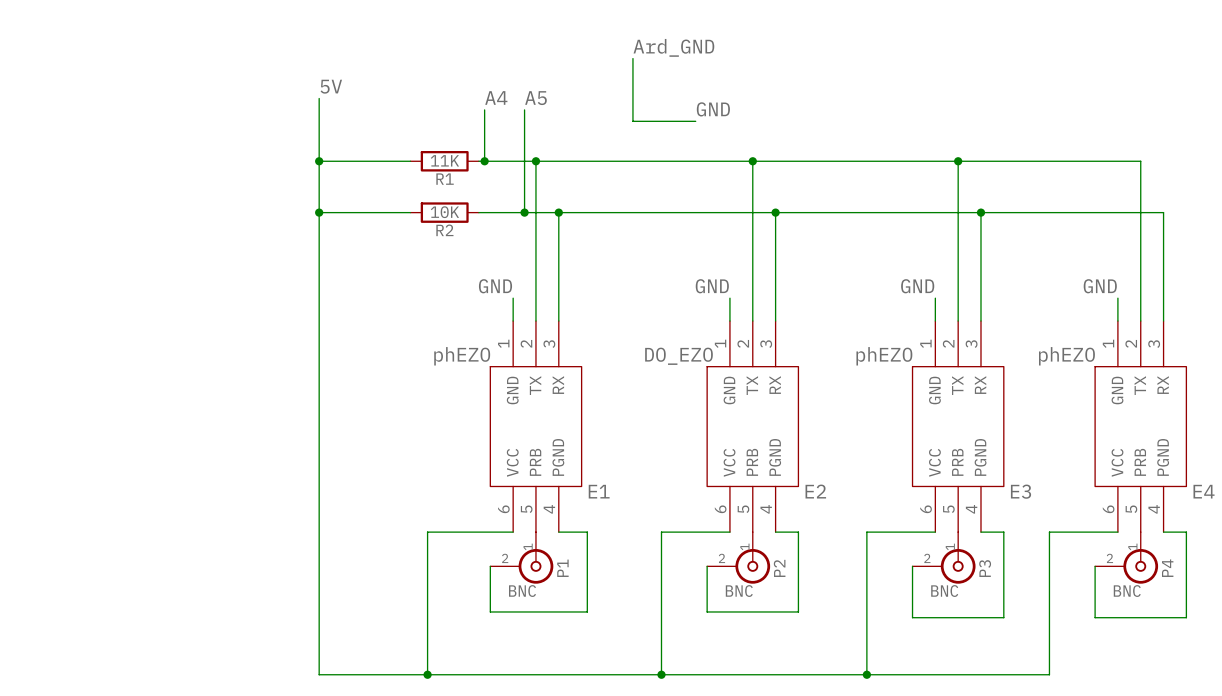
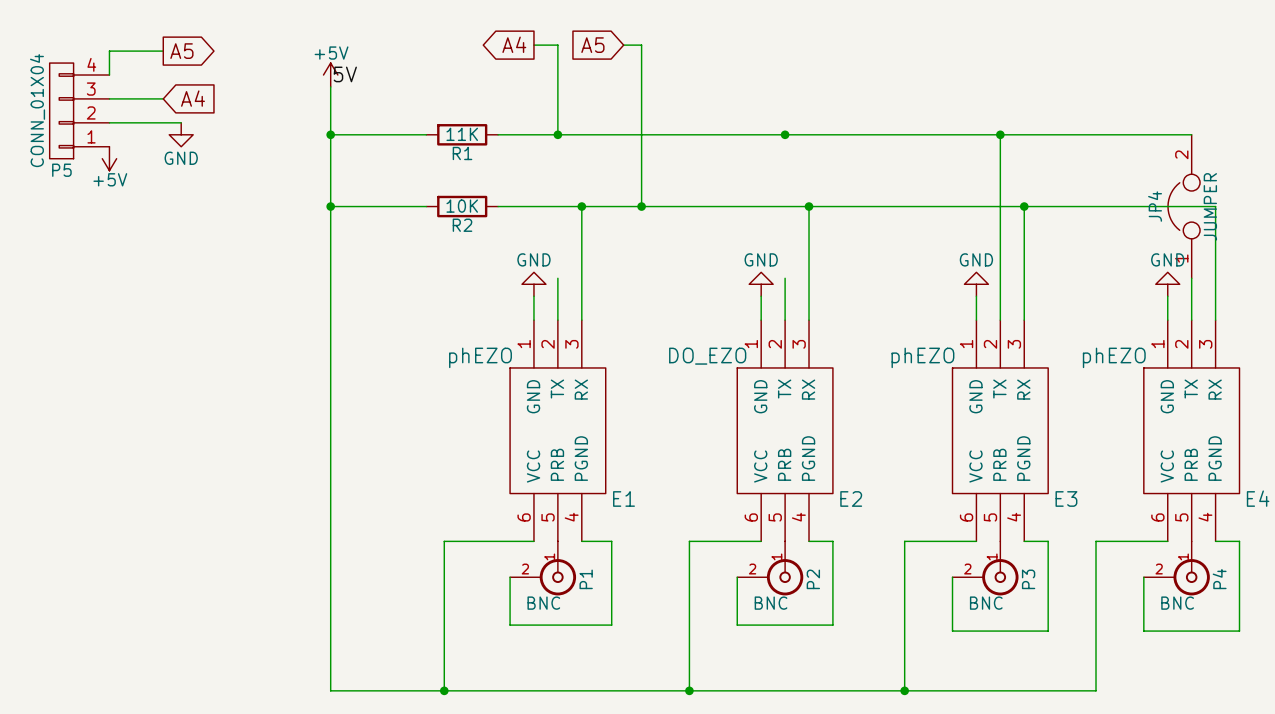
label: Ard_GND (673, 47) -> none
global label: none -> A4 (514, 44)
wire: none -> (533, 45) (557, 45) (557, 134)
global label: none -> A5 (592, 45)
wire: none -> (623, 45) (641, 45) (641, 206)
wire: (632, 58) (632, 121) (695, 121) -> none
wire: none -> (163, 51) (109, 51) (109, 75)
global label: none -> A5 (181, 51)
power symbol: none -> +5V (330, 75)
label: A4 (496, 97) -> none
label: A5 (535, 98) -> none
wire: none -> (109, 98) (163, 98)
global label: none -> A4 (193, 98)
wire: (484, 109) (484, 161) -> none
wire: (524, 109) (524, 212) -> none
label: GND (713, 109) -> none
P5: none -> CONN_01X04 (79, 110)
wire: none -> (109, 122) (181, 122)
power symbol: none -> GND (181, 134)
wire: none -> (498, 134) (1191, 134)
wire: none -> (1000, 134) (1000, 152)
wire: (319, 161) (410, 161) -> (330, 134) (426, 134)
junction position: (319, 161) -> (330, 134)
R1 position: (444, 161) -> (462, 134)
wire: (478, 161) (1140, 161) (1140, 281) -> none
junction: (484, 161) -> none
wire: (535, 161) (535, 281) -> none
junction position: (535, 161) -> (557, 134)
wire: (752, 161) (752, 281) -> none
junction position: (752, 161) -> (785, 134)
junction position: (958, 161) -> (1000, 134)
power symbol: none -> +5V (109, 158)
junction: (524, 212) -> none
junction: none -> (641, 206)
JP4: none -> JUMPER (1184, 206)
label: GND (495, 286) -> none
power symbol: none -> GND (533, 284)
label: GND (712, 286) -> none
power symbol: none -> GND (761, 284)
label: GND (917, 286) -> none
power symbol: none -> GND (976, 284)
label: GND (1100, 286) -> none
power symbol: none -> GND (1167, 284)

